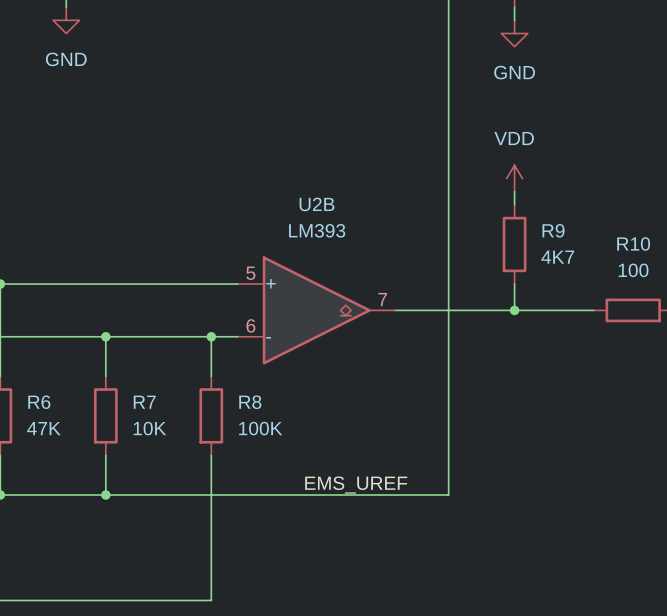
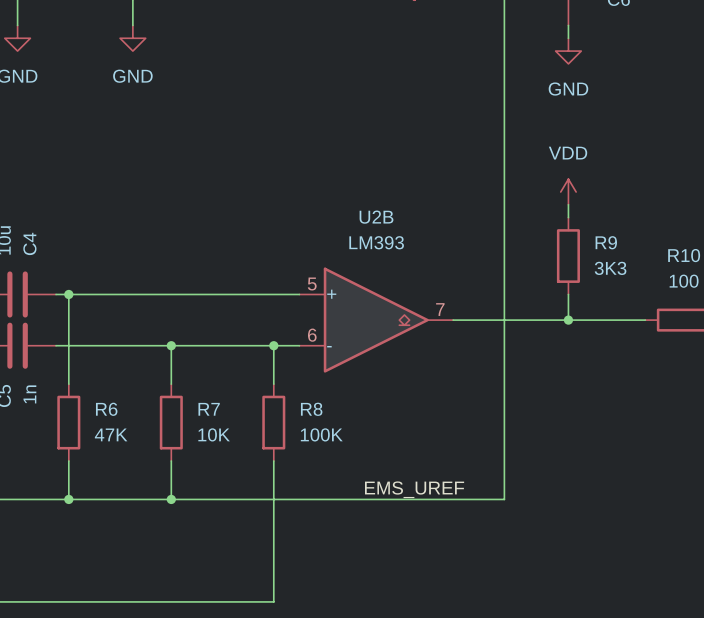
R9 value: 4K7 (557, 257) -> 3K3 (610, 268)

